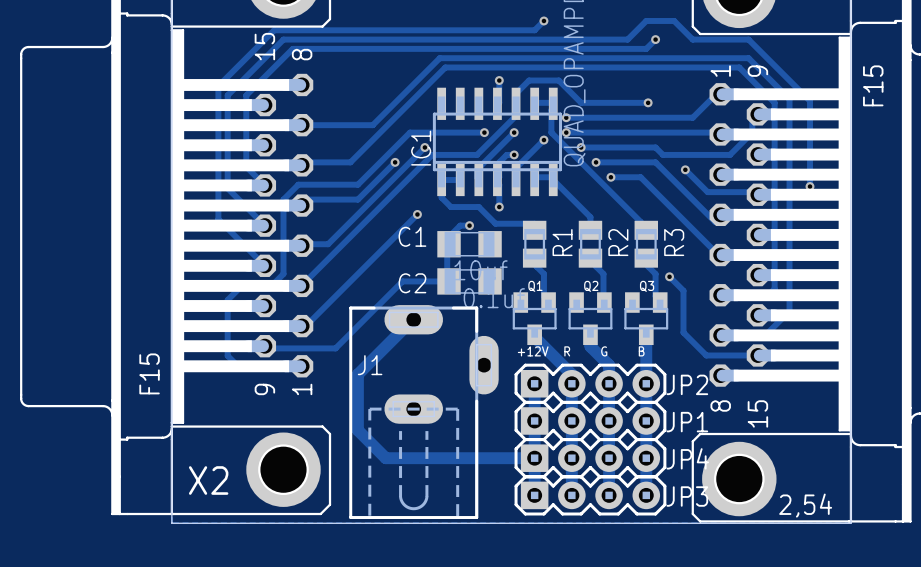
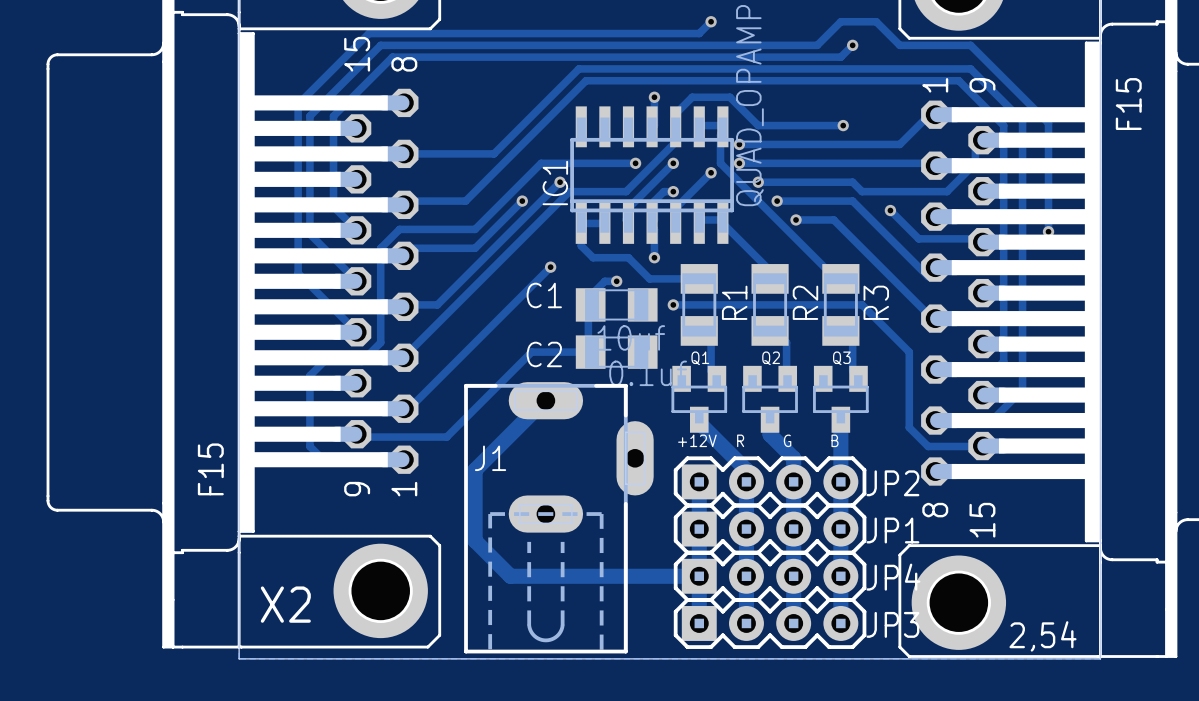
R1 footprint: [522, 220, 547, 268] -> [680, 264, 718, 346]
R2 footprint: [578, 220, 603, 268] -> [751, 264, 789, 346]
R3 footprint: [634, 220, 659, 268] -> [822, 264, 860, 346]
via: none -> (673, 304)
track: (669, 276) (683, 290) (683, 332) (706, 355) (757, 355) -> (673, 304) (862, 304) (909, 352) (909, 427) (928, 446) (982, 446)
via: (669, 276) -> none

